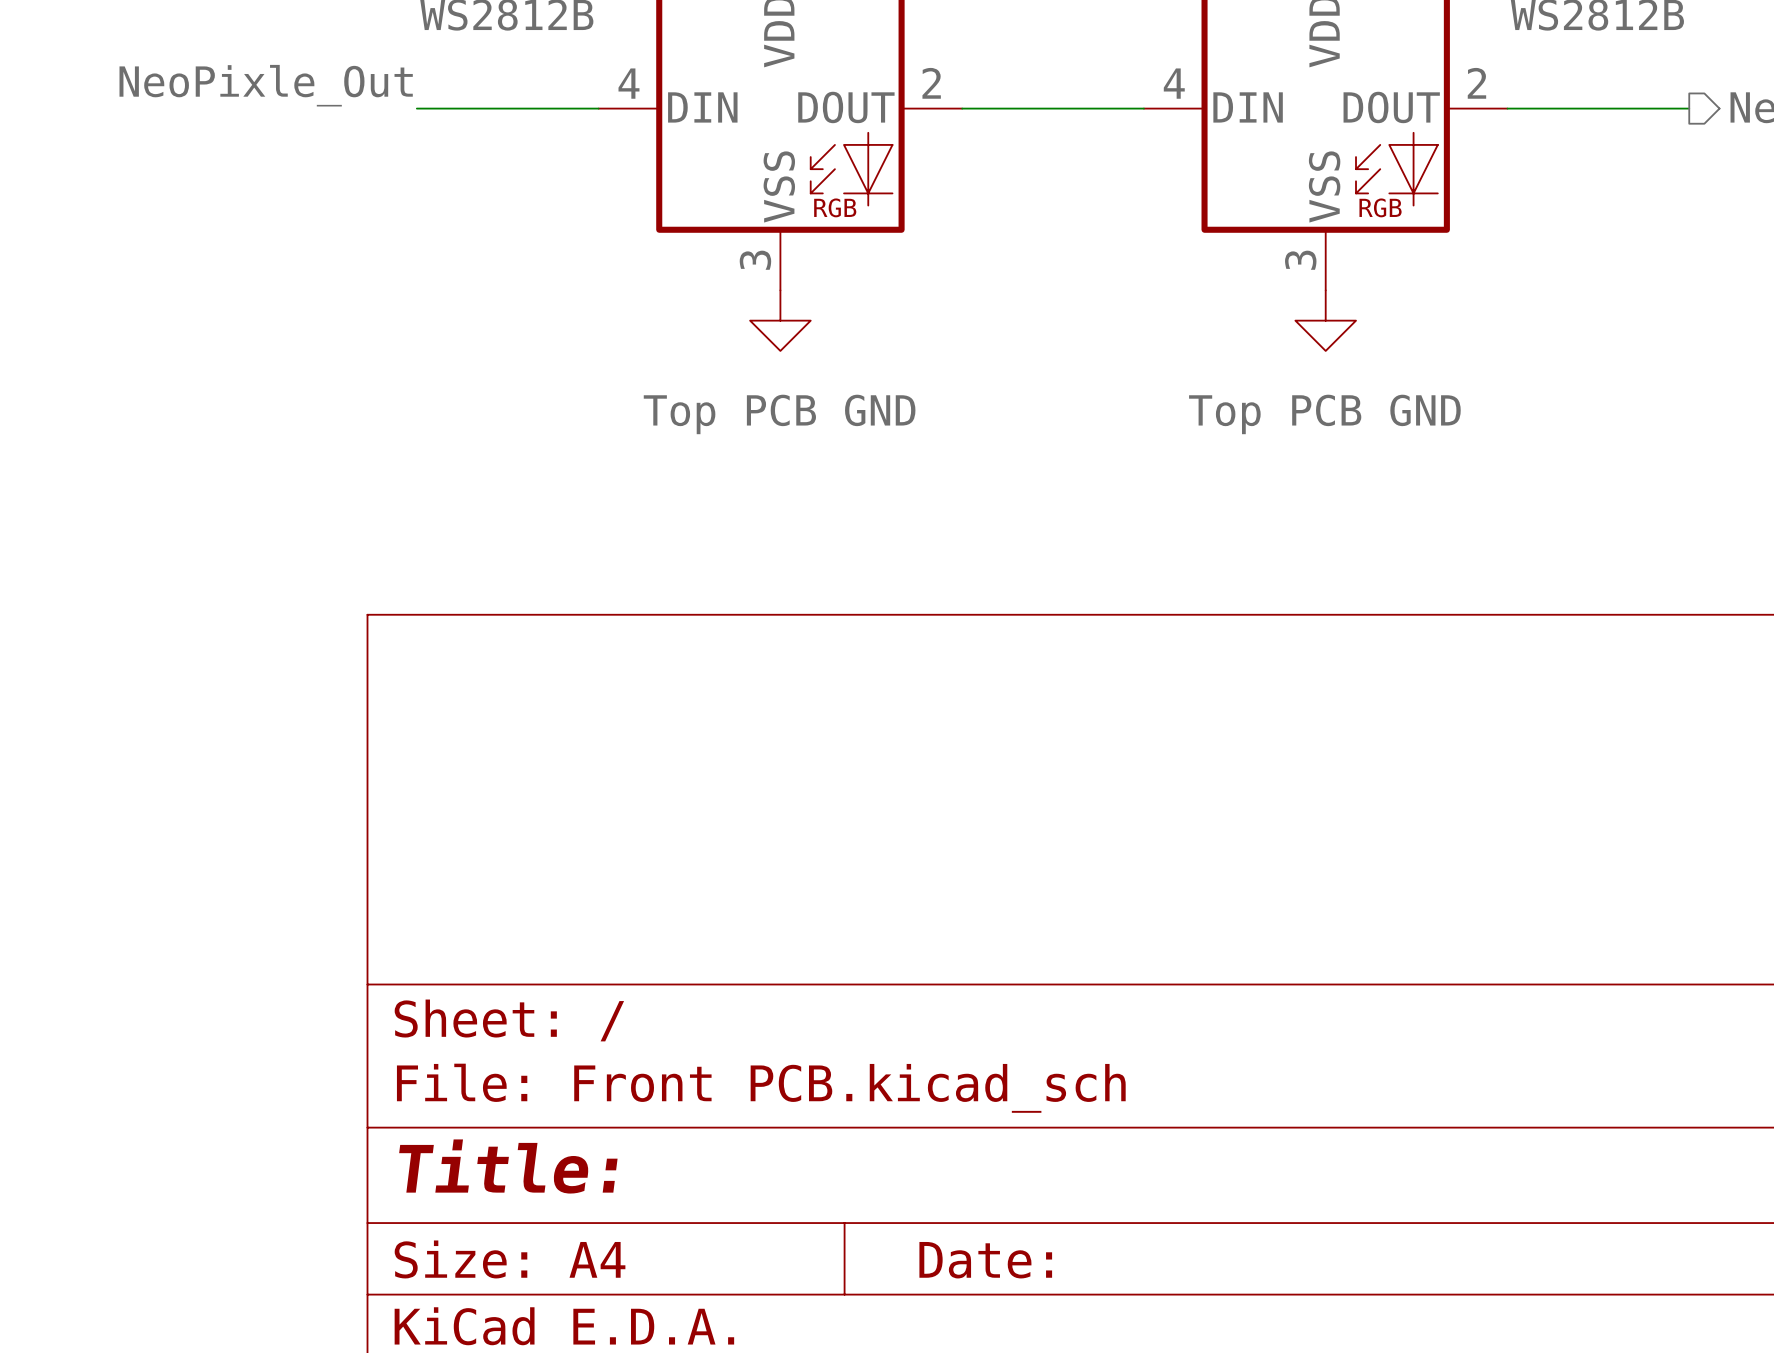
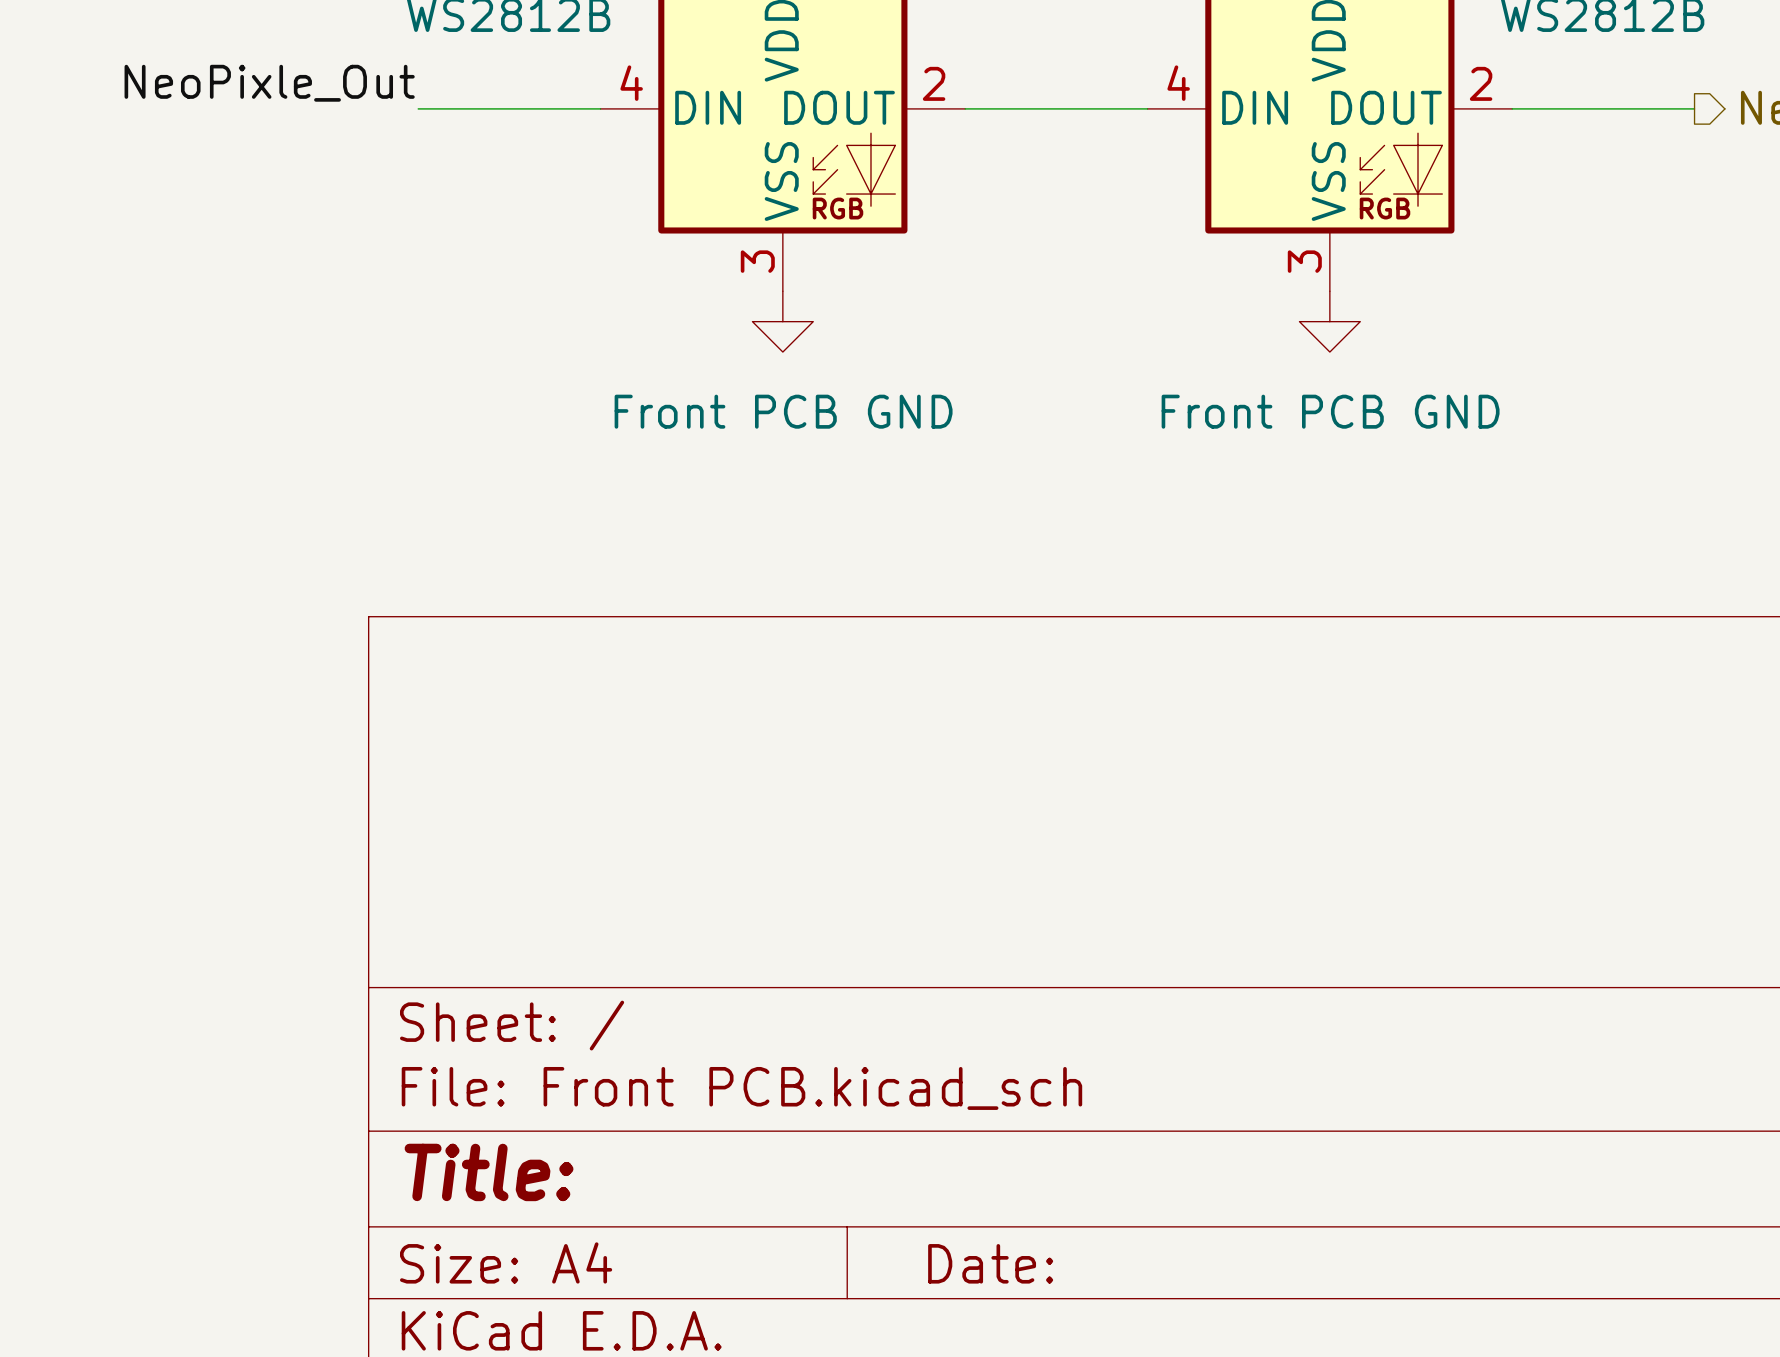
power symbol: Top PCB GND (780, 320) -> Front PCB GND (782, 321)
power symbol: Top PCB GND (1325, 320) -> Front PCB GND (1329, 321)

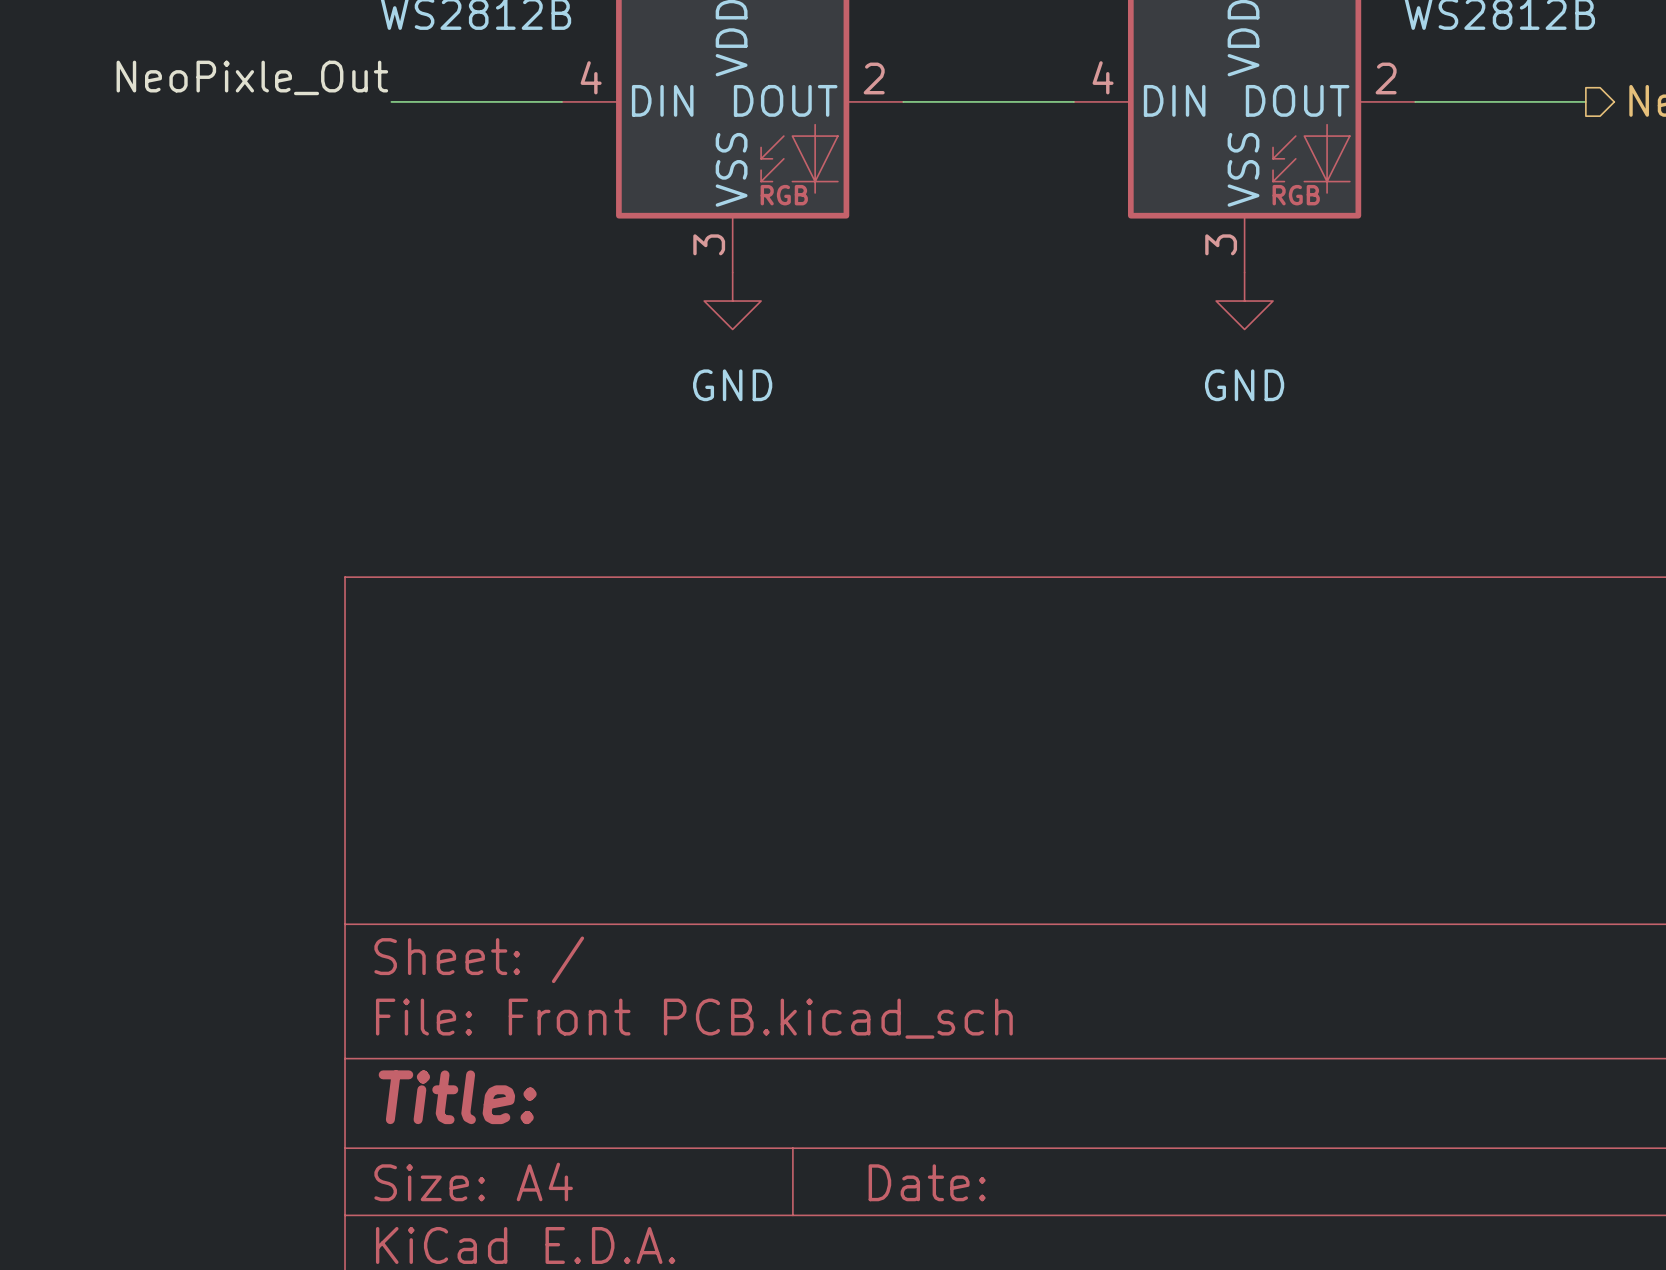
power symbol: Front PCB GND (782, 321) -> GND (732, 301)
power symbol: Front PCB GND (1329, 321) -> GND (1244, 301)

